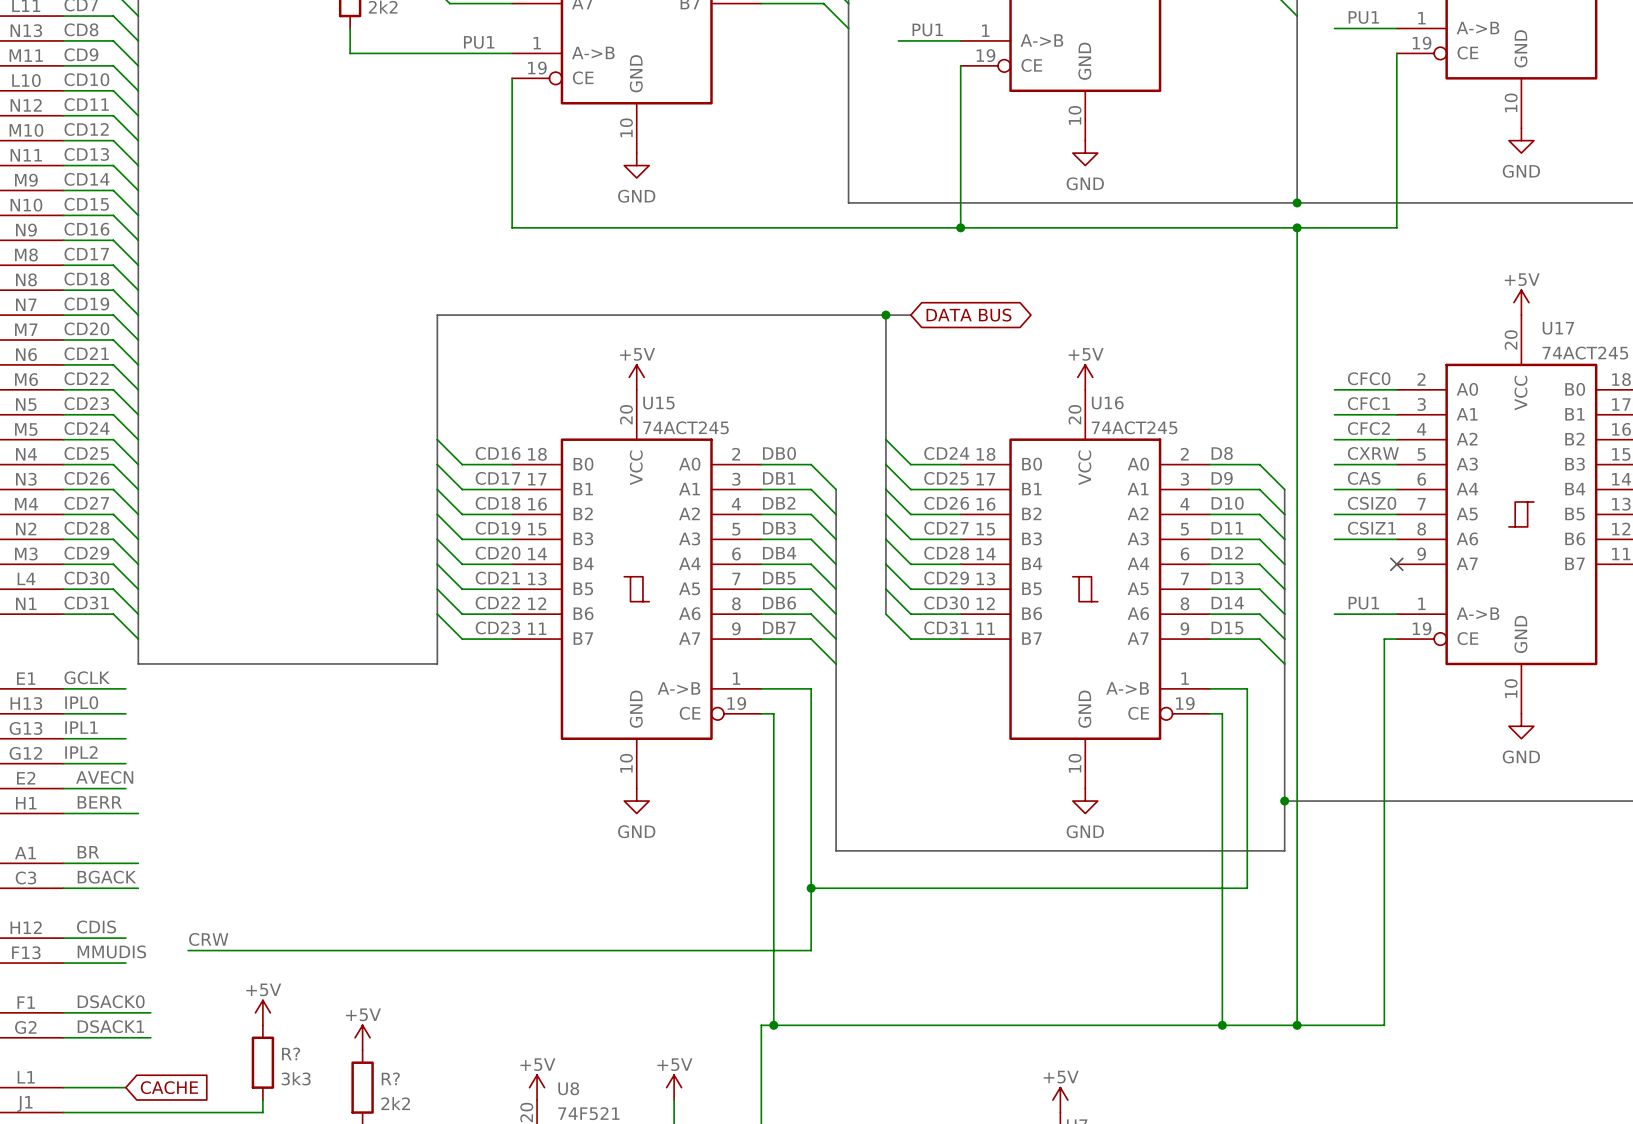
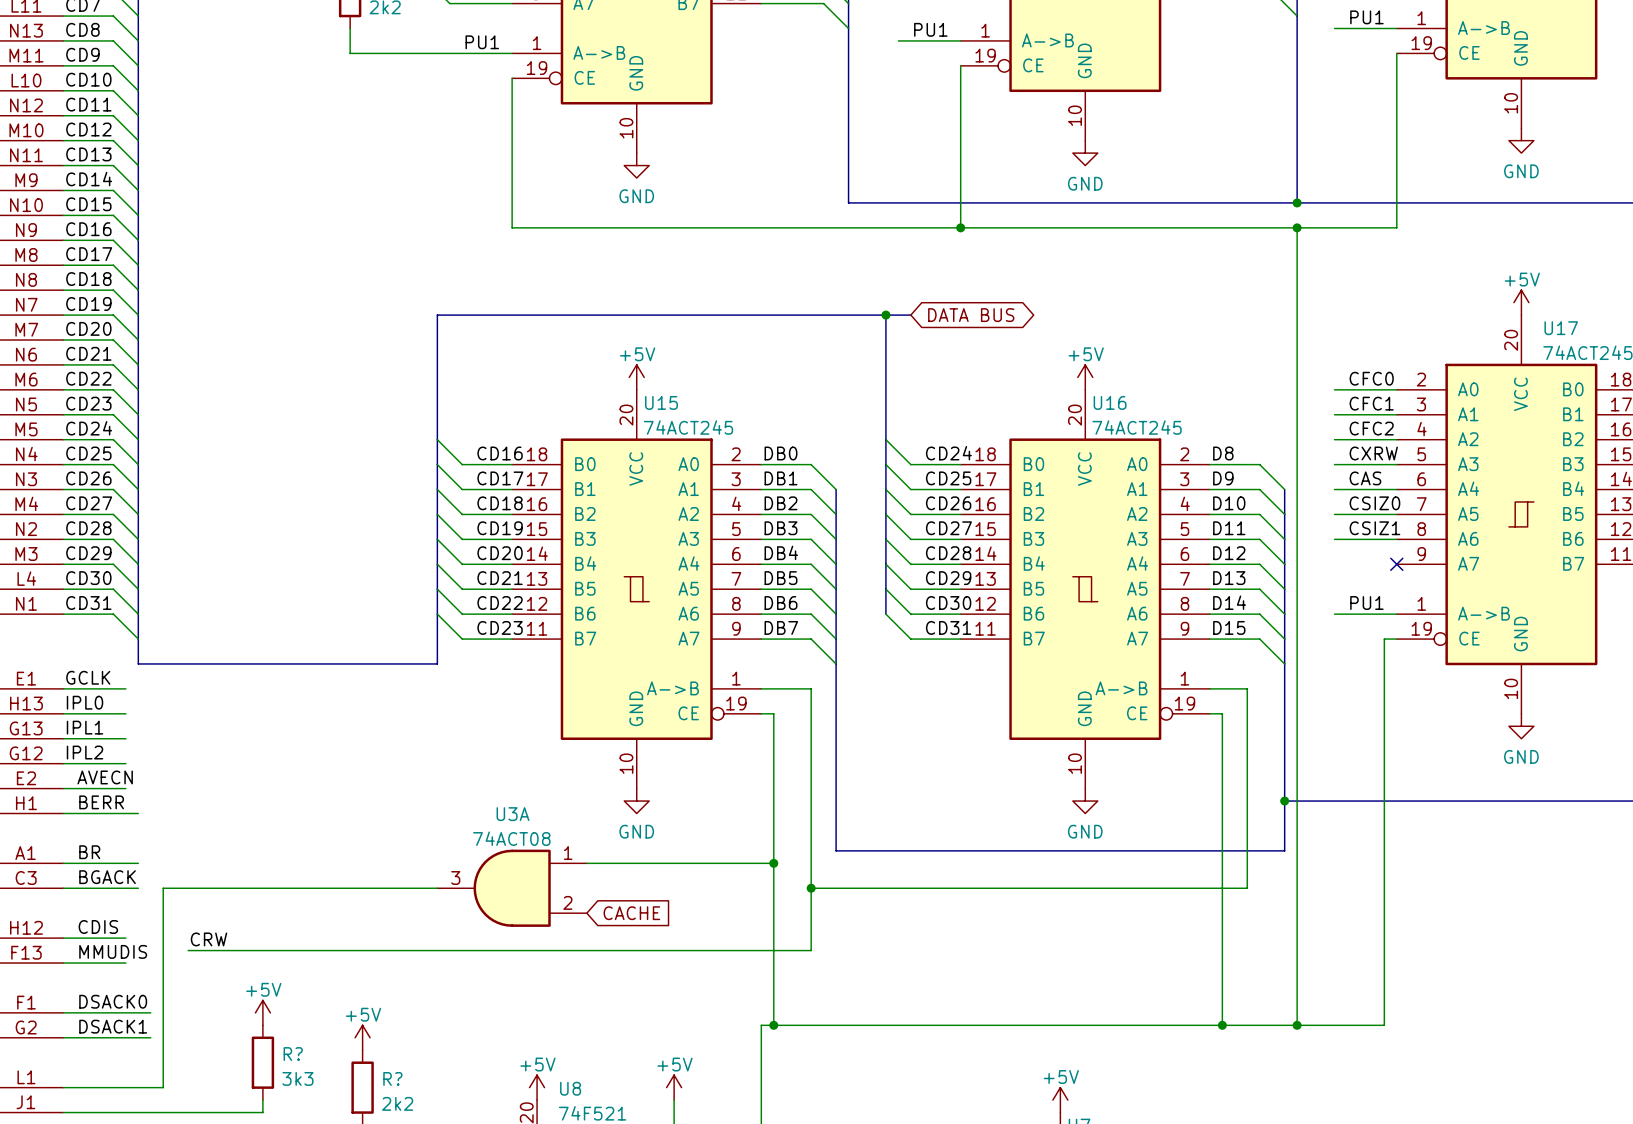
wire: none -> (586, 863) (773, 863)
junction: none -> (773, 863)
wire: none -> (437, 888) (163, 888) (163, 1087) (125, 1087)
U3A: none -> 74ACT08 (512, 888)
global label: none -> CACHE (631, 913)
global label: CACHE (169, 1087) -> none

